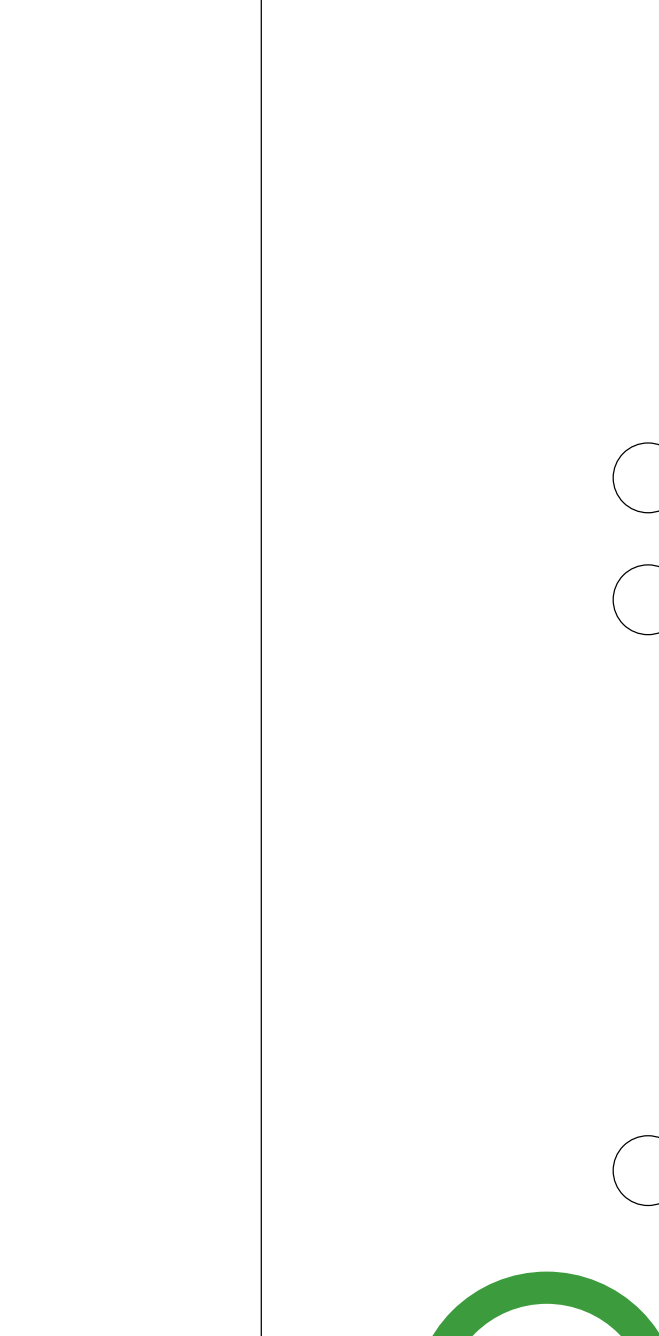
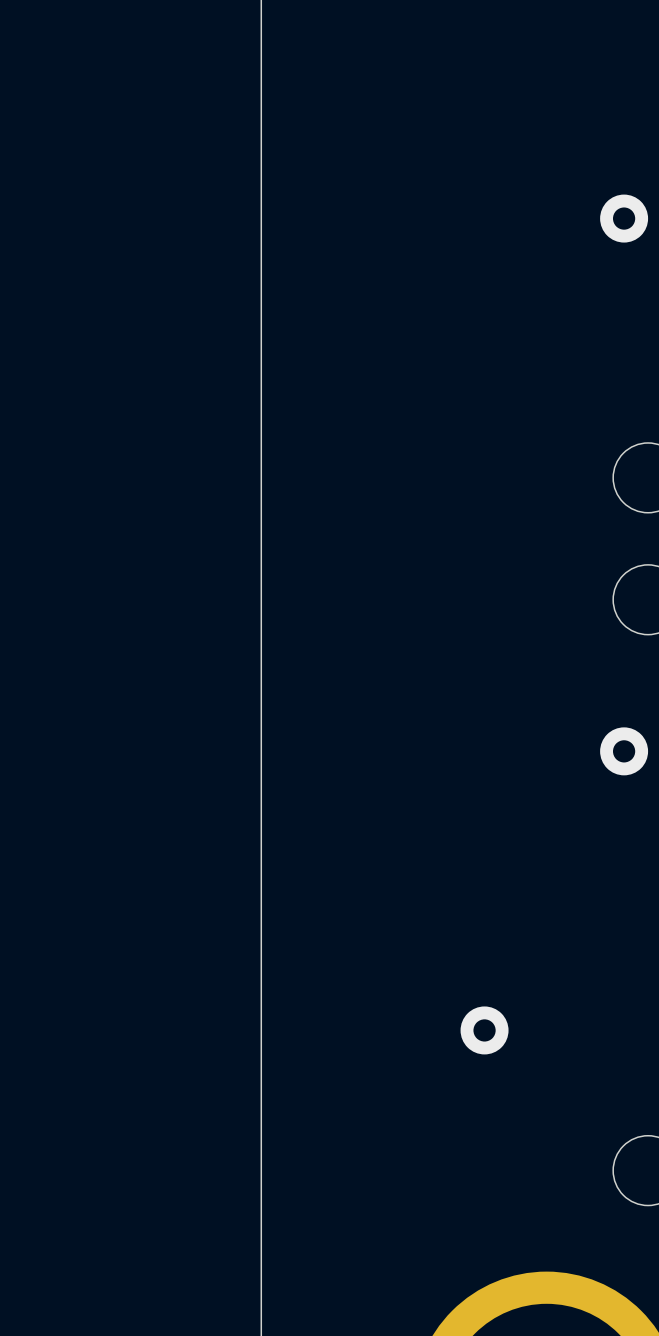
via: none -> (624, 218)
via: none -> (624, 751)
via: none -> (484, 1030)

